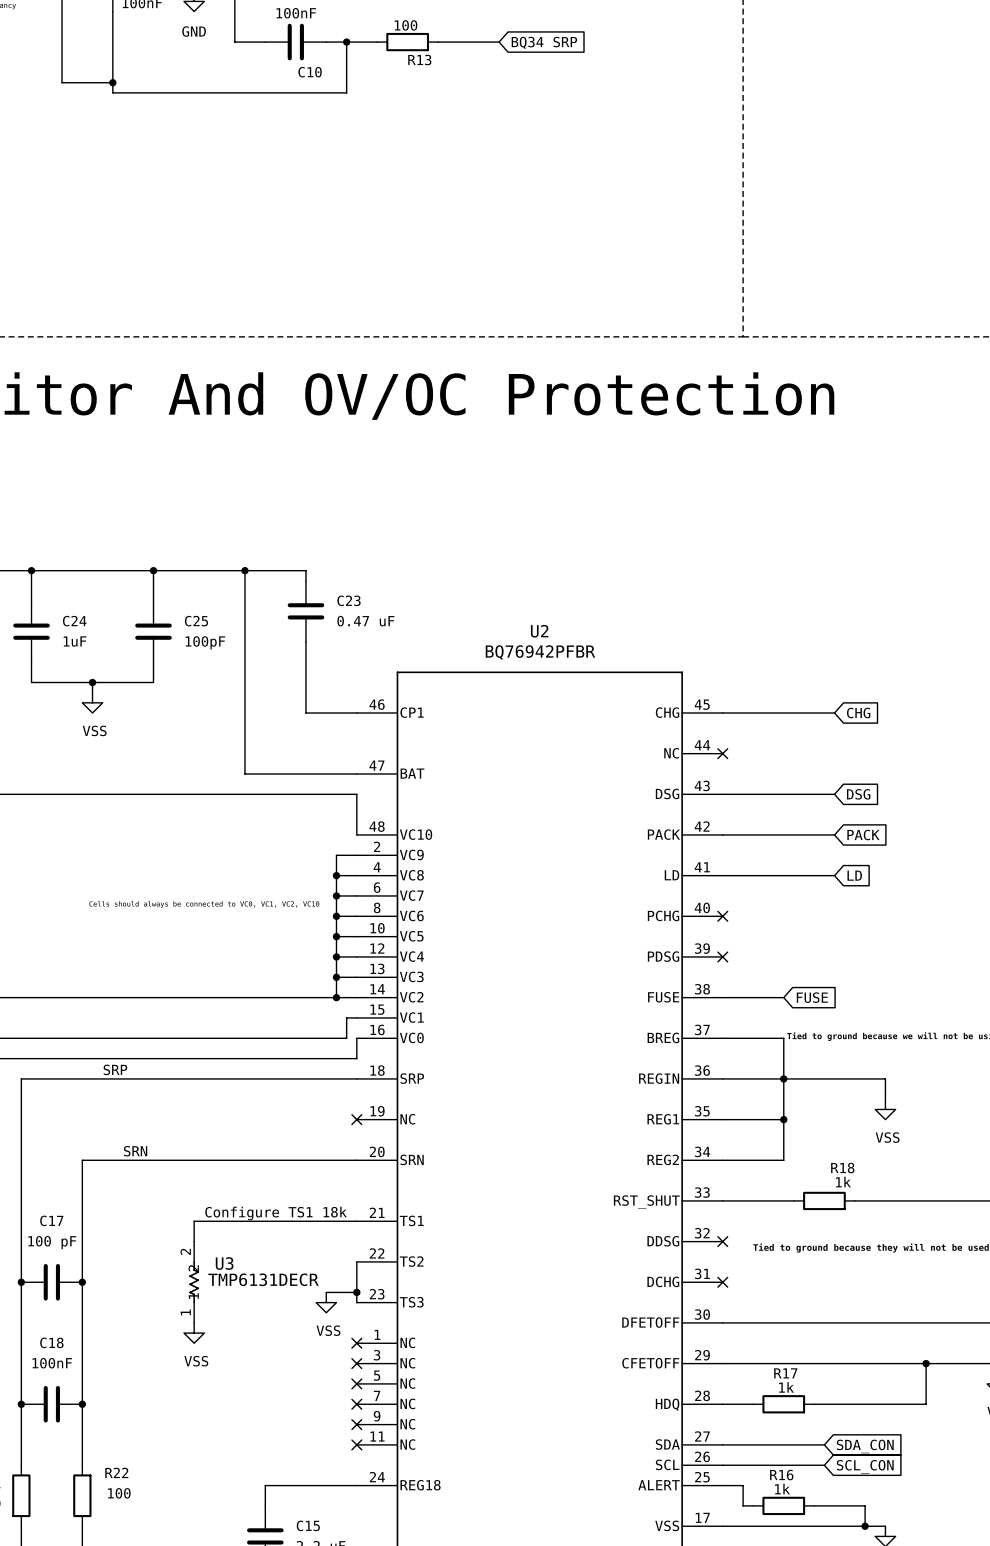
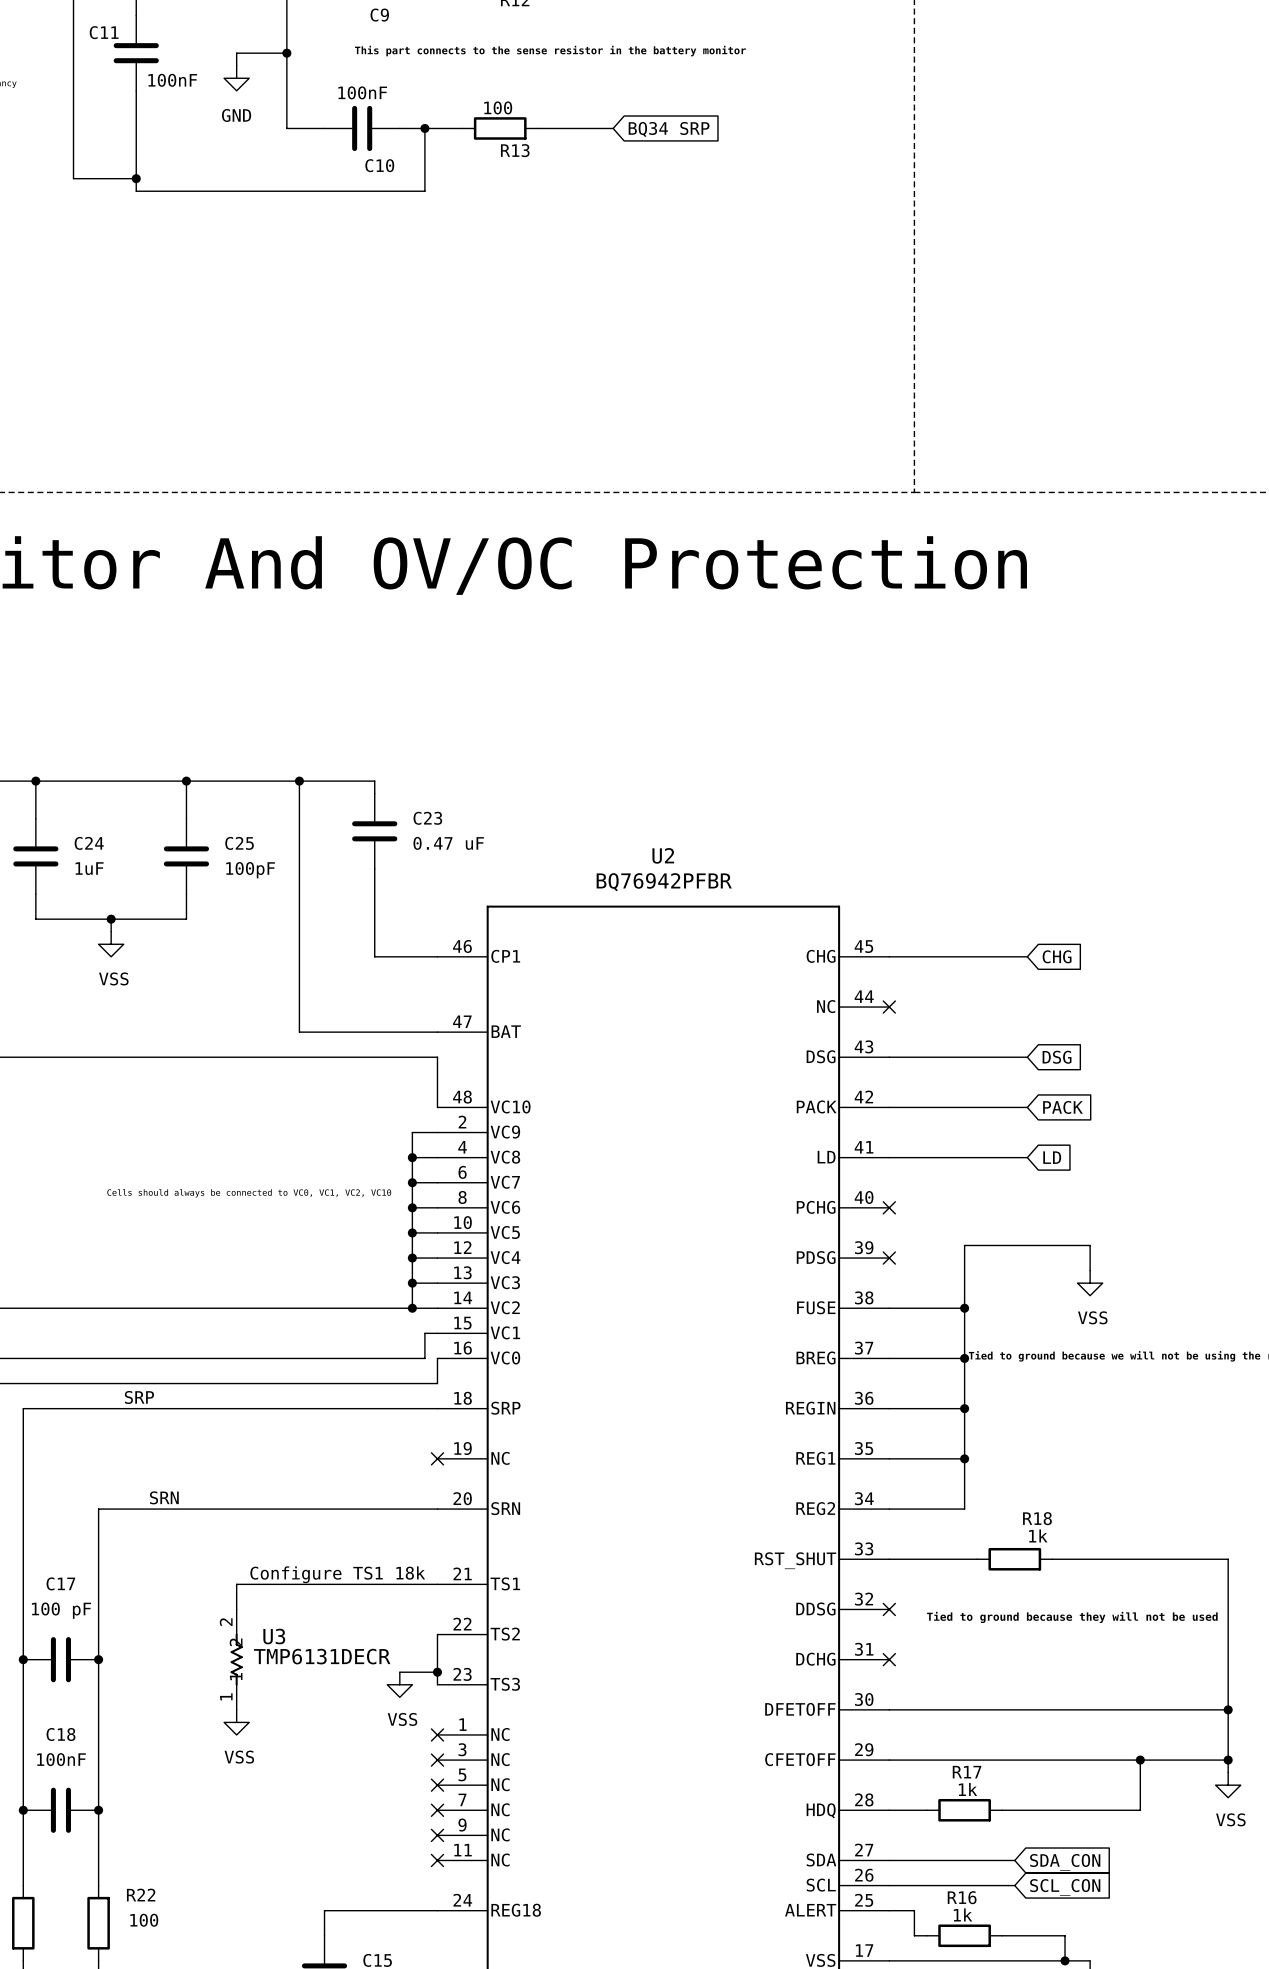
wire: none -> (1090, 1270) (1090, 1245) (964, 1245) (964, 1358)
junction: none -> (964, 1308)
global label: FUSE (812, 997) -> none
junction: none -> (964, 1358)
wire: (783, 1078) (885, 1078) (885, 1099) -> none
power symbol position: VSS (885, 1109) -> VSS (1090, 1283)

